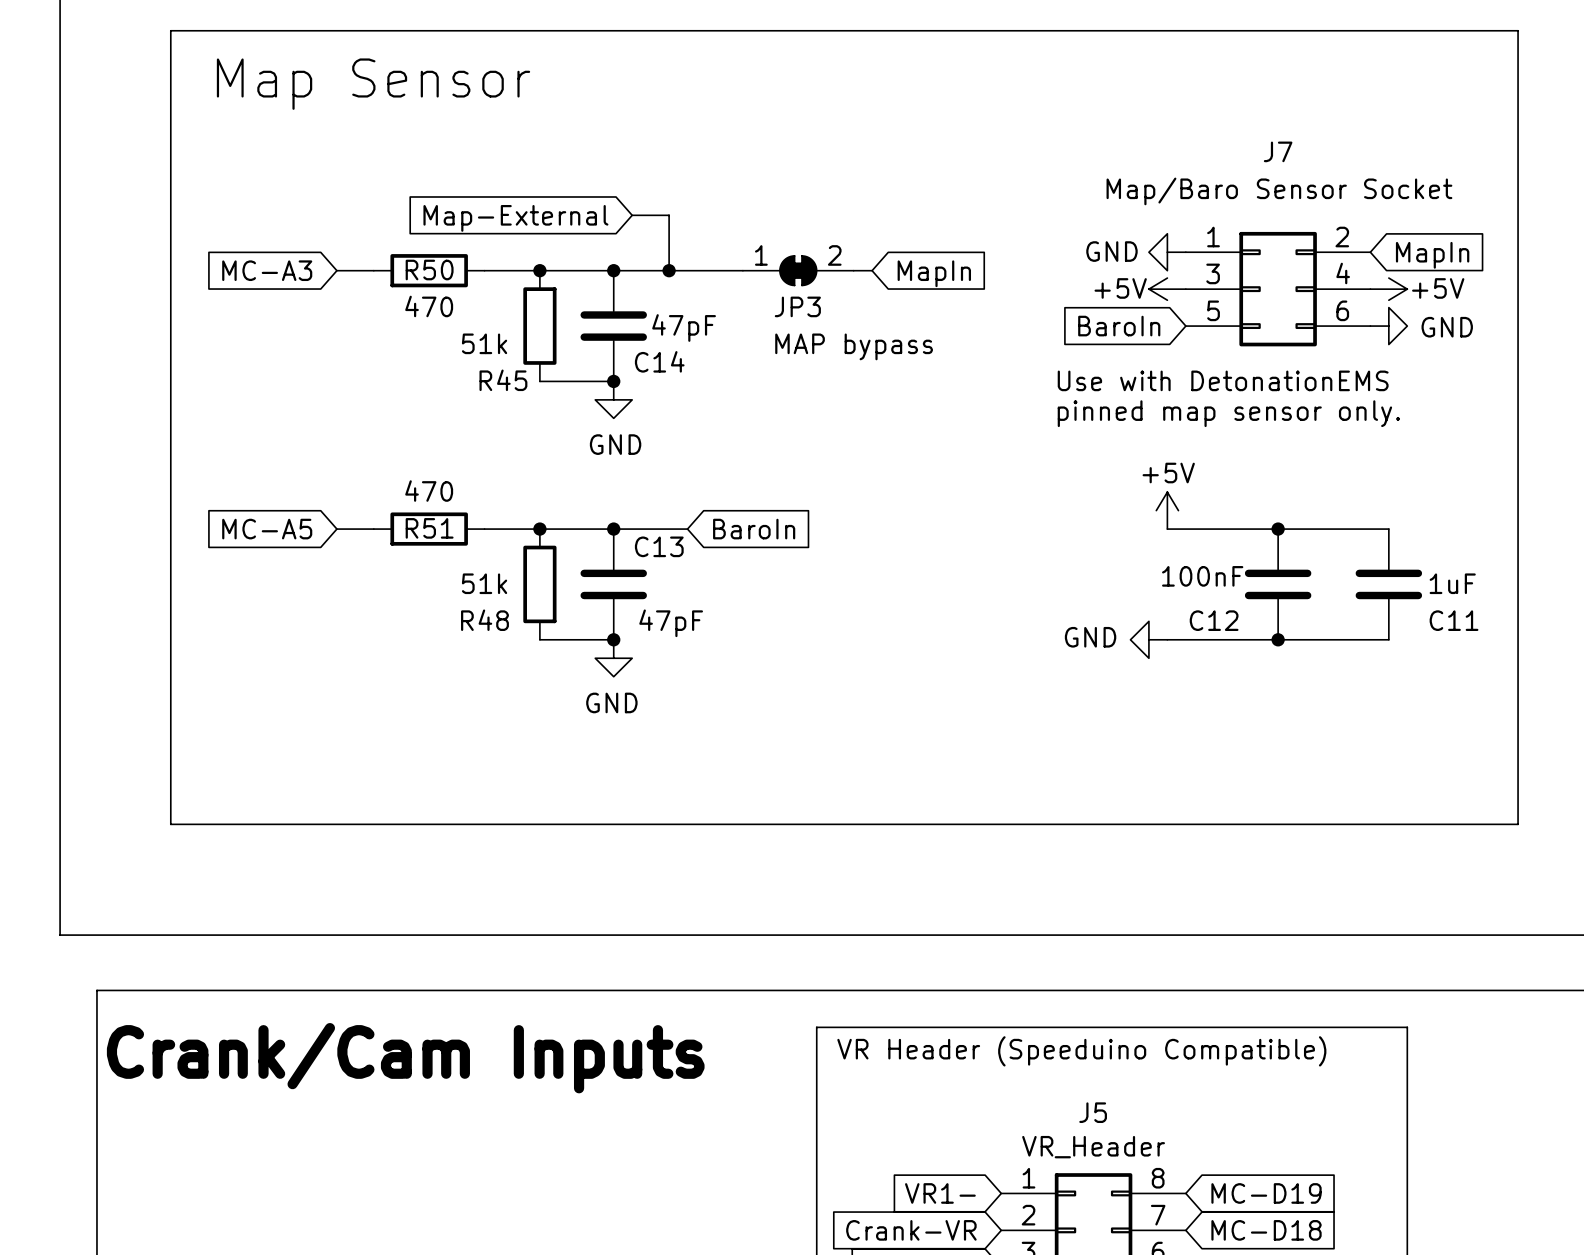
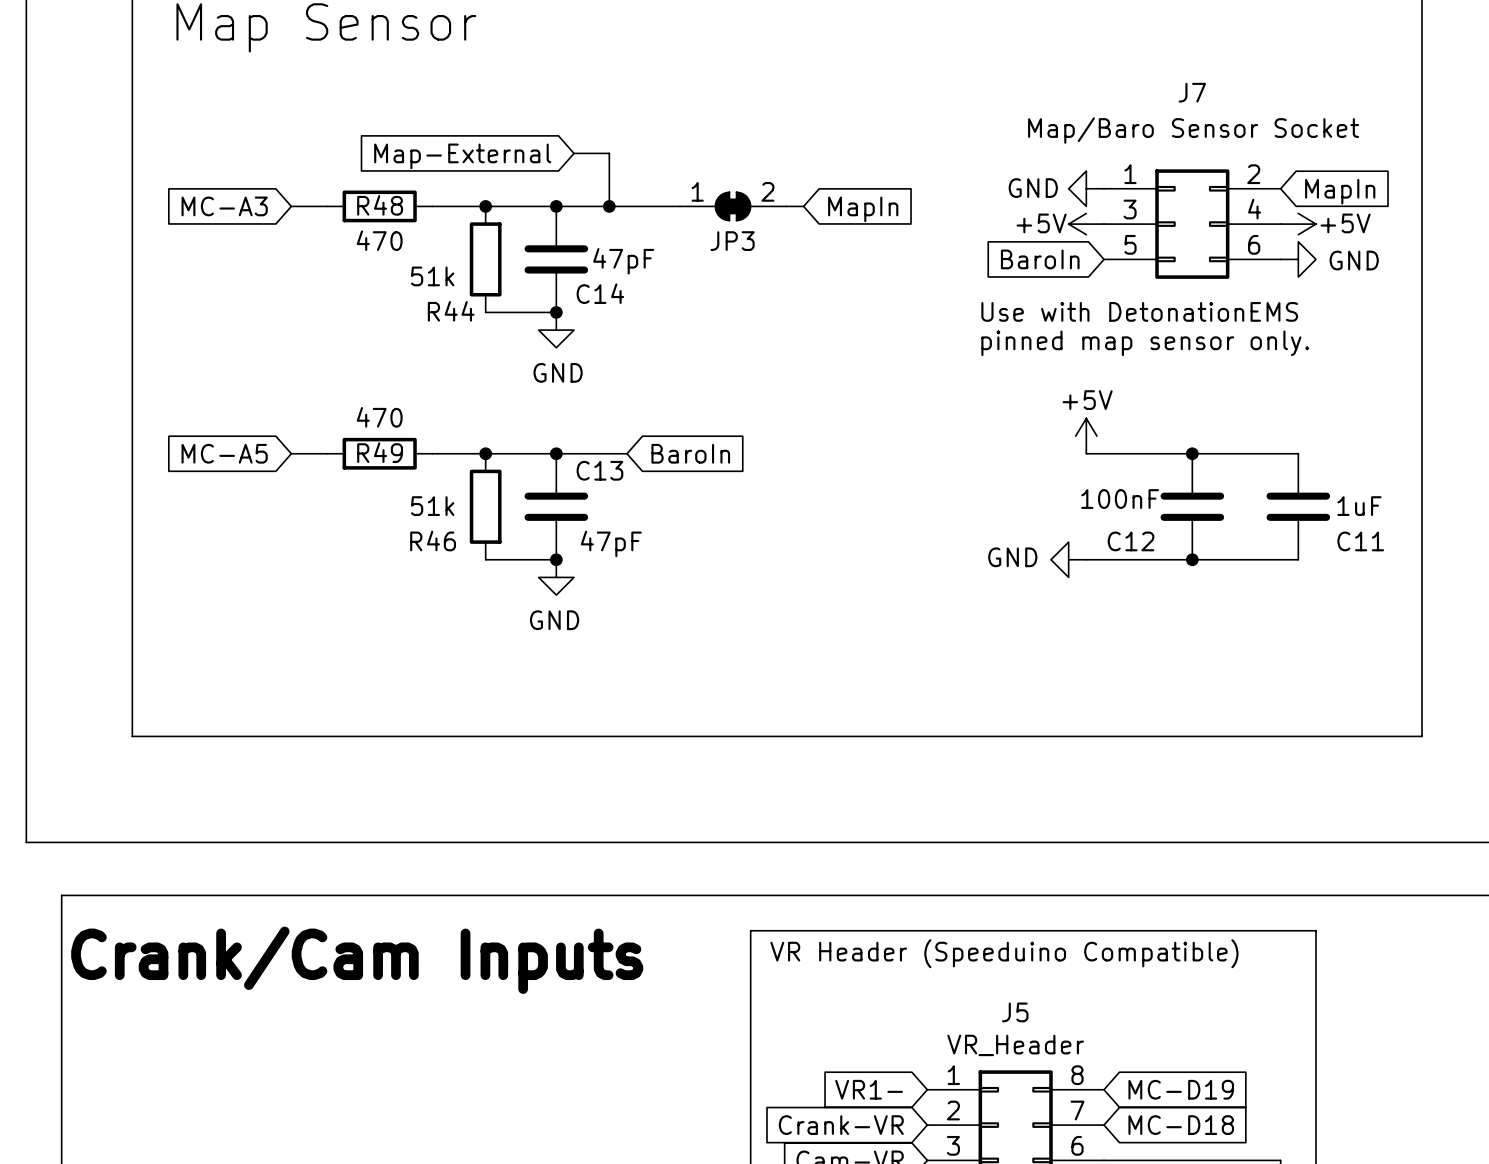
R50 name: R50 (429, 270) -> R48 (380, 205)
JP3 value: MAP bypass (854, 346) -> none
R45 name: R45 (503, 380) -> R44 (451, 311)
R51 name: R51 (429, 528) -> R49 (380, 452)
R48 name: R48 (484, 620) -> R46 (433, 541)

